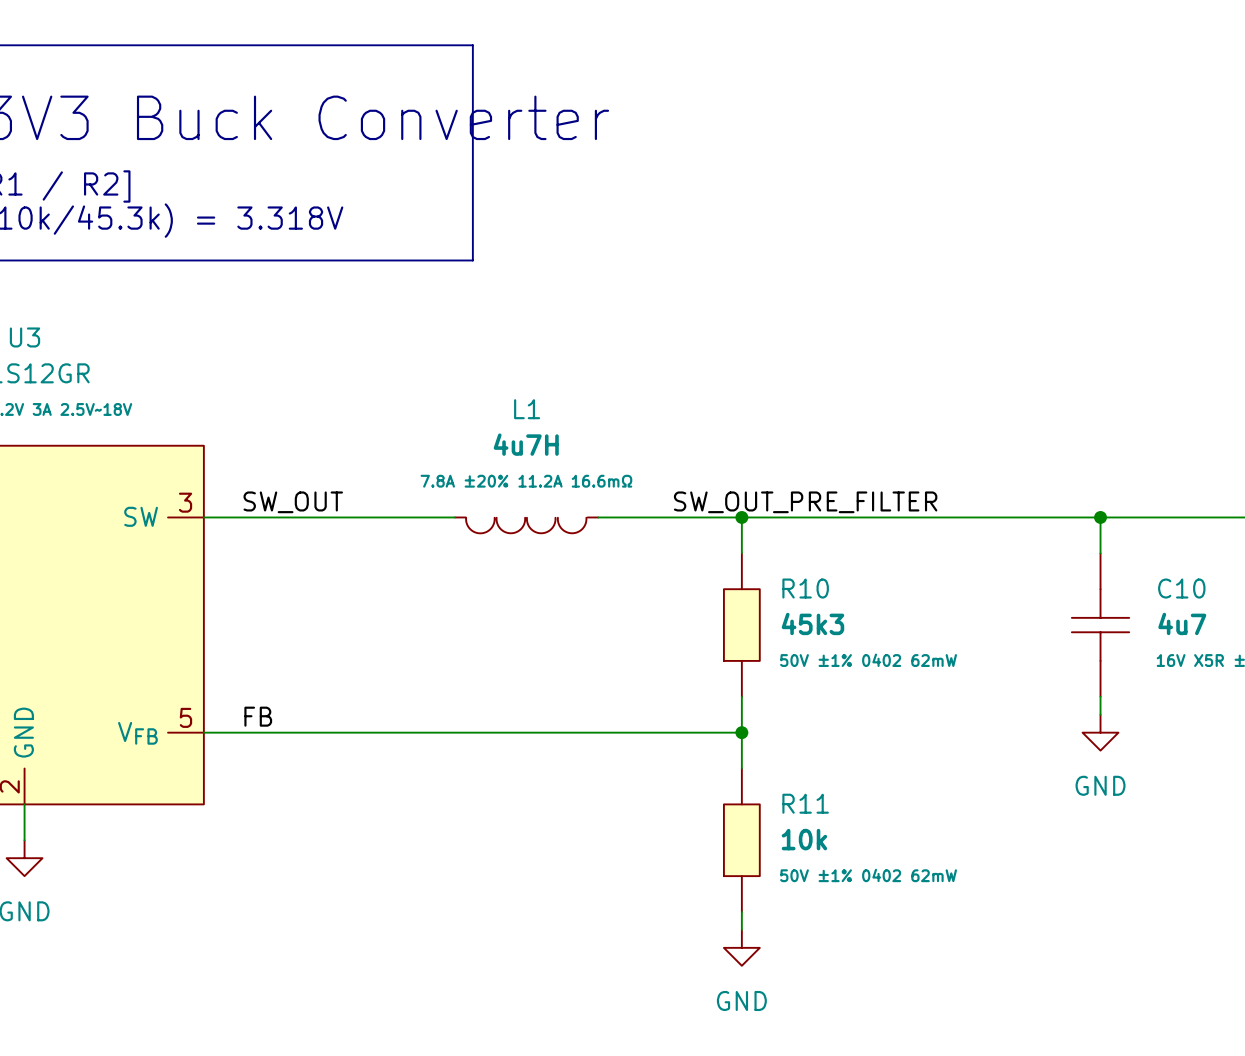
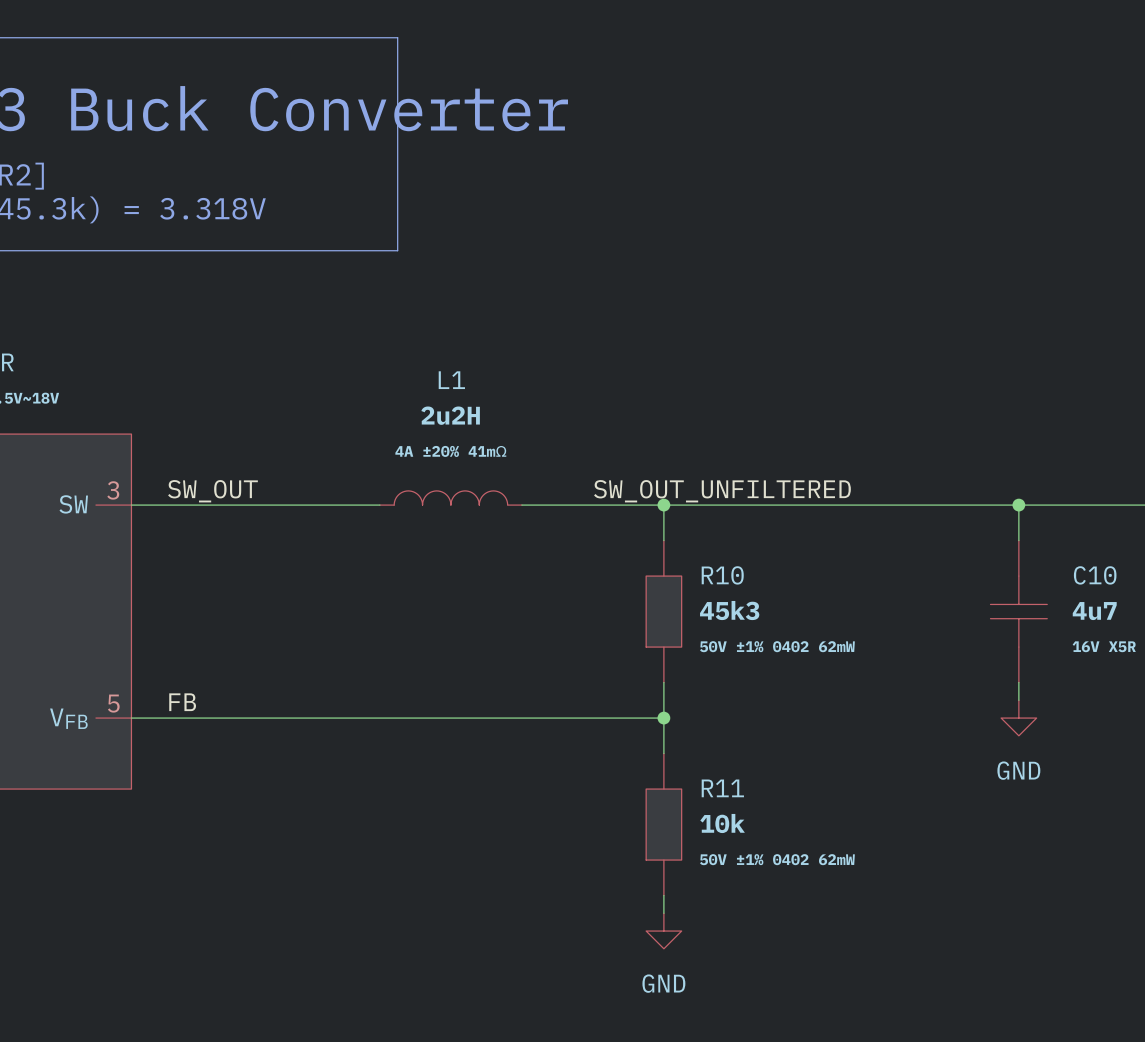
L1 value: 4u7H (526, 444) -> 2u2H (450, 415)
L1 text: none -> 4A ±20% 41mΩ (450, 451)
L1 text: 7.8A ±20% 11.2A 16.6mΩ (526, 481) -> none
label: SW_OUT_PRE_FILTER (805, 502) -> SW_OUT_UNFILTERED (722, 491)
L1 symbol: [454, 517, 599, 534] -> [379, 490, 522, 506]

